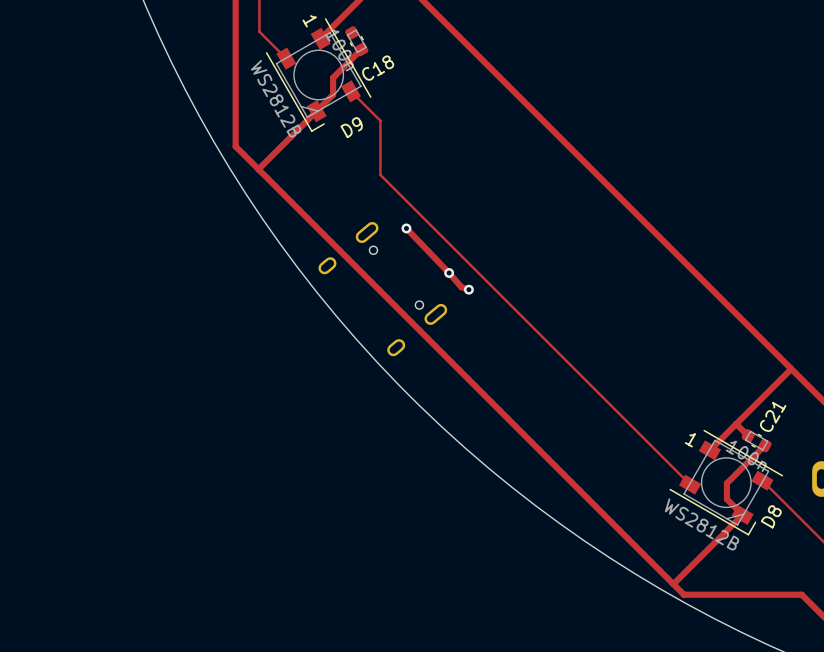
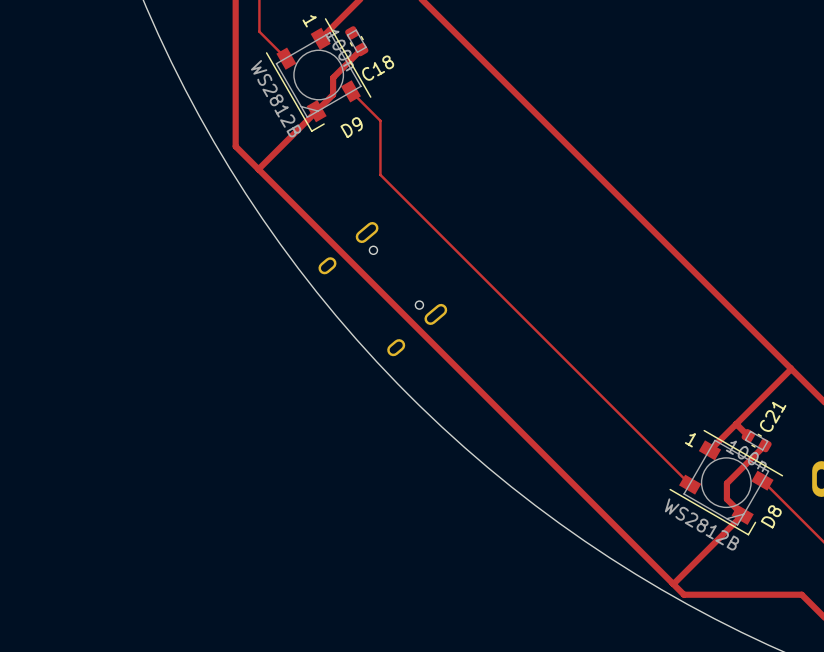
track: (406, 228) (461, 287) (468, 289) -> none
via: (406, 228) -> none
via: (449, 273) -> none
via: (468, 289) -> none

